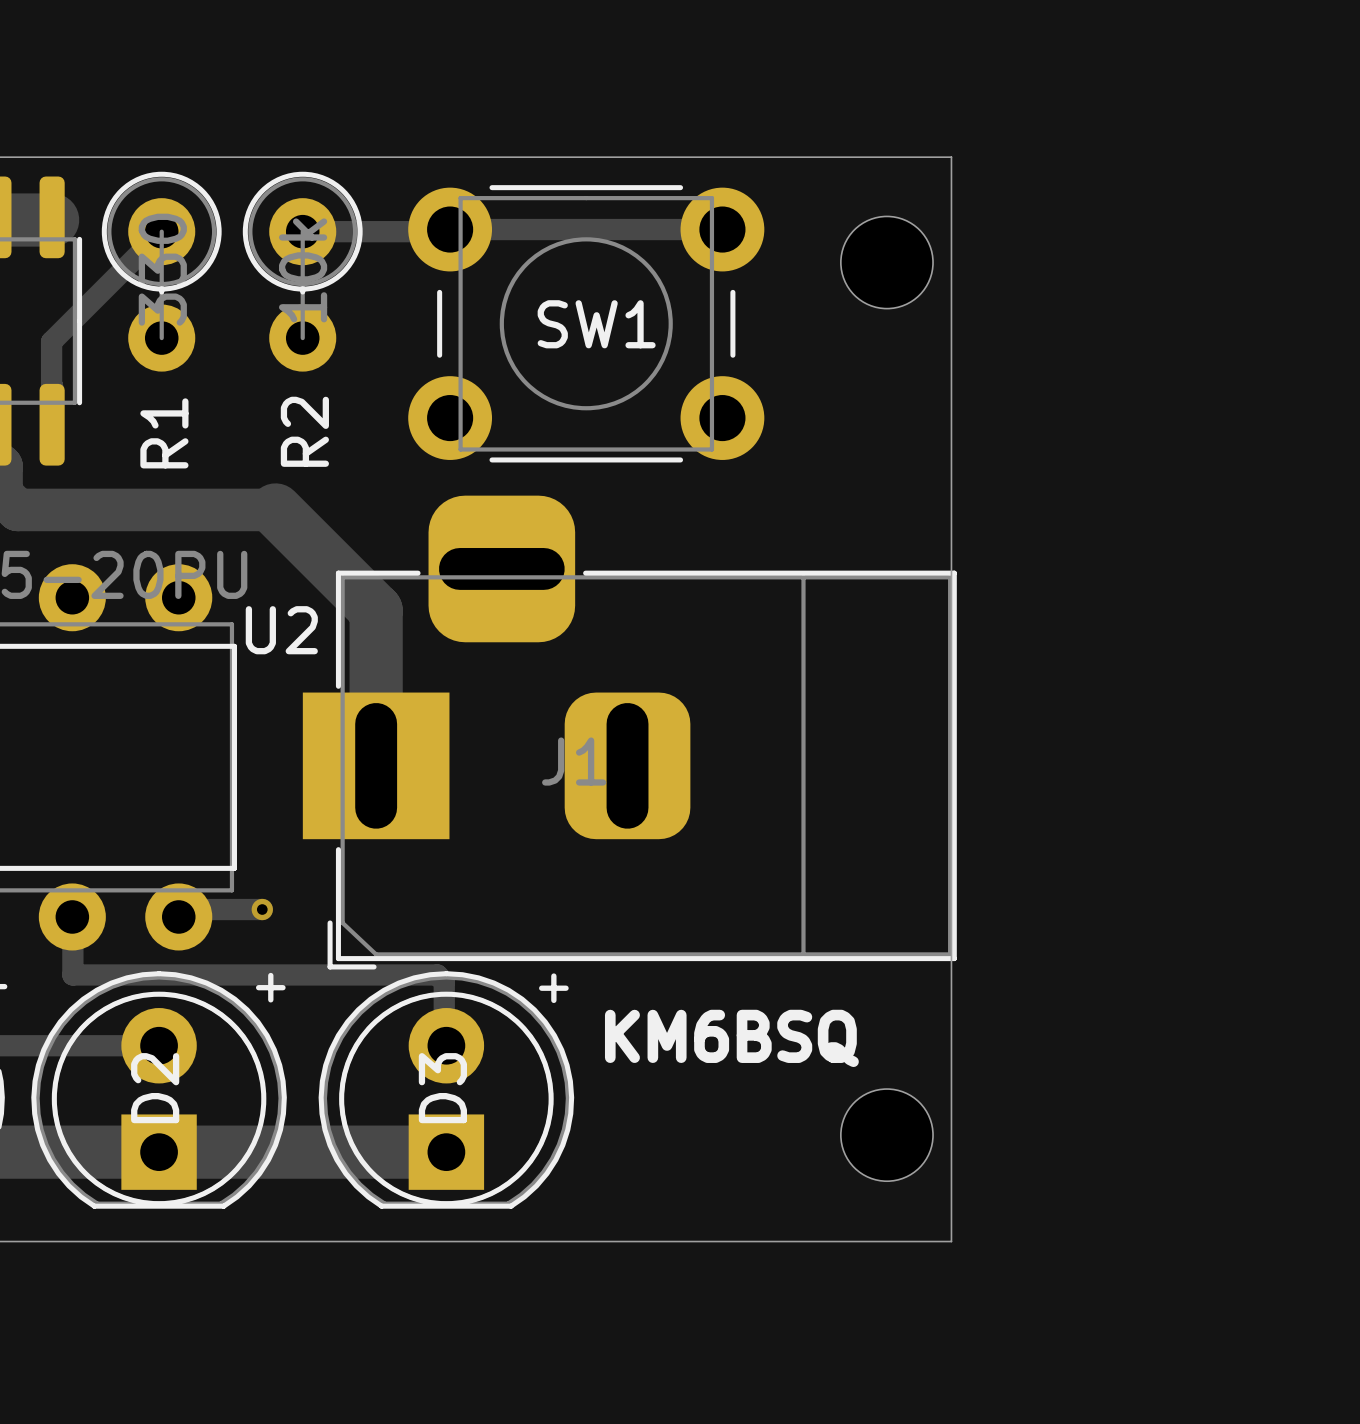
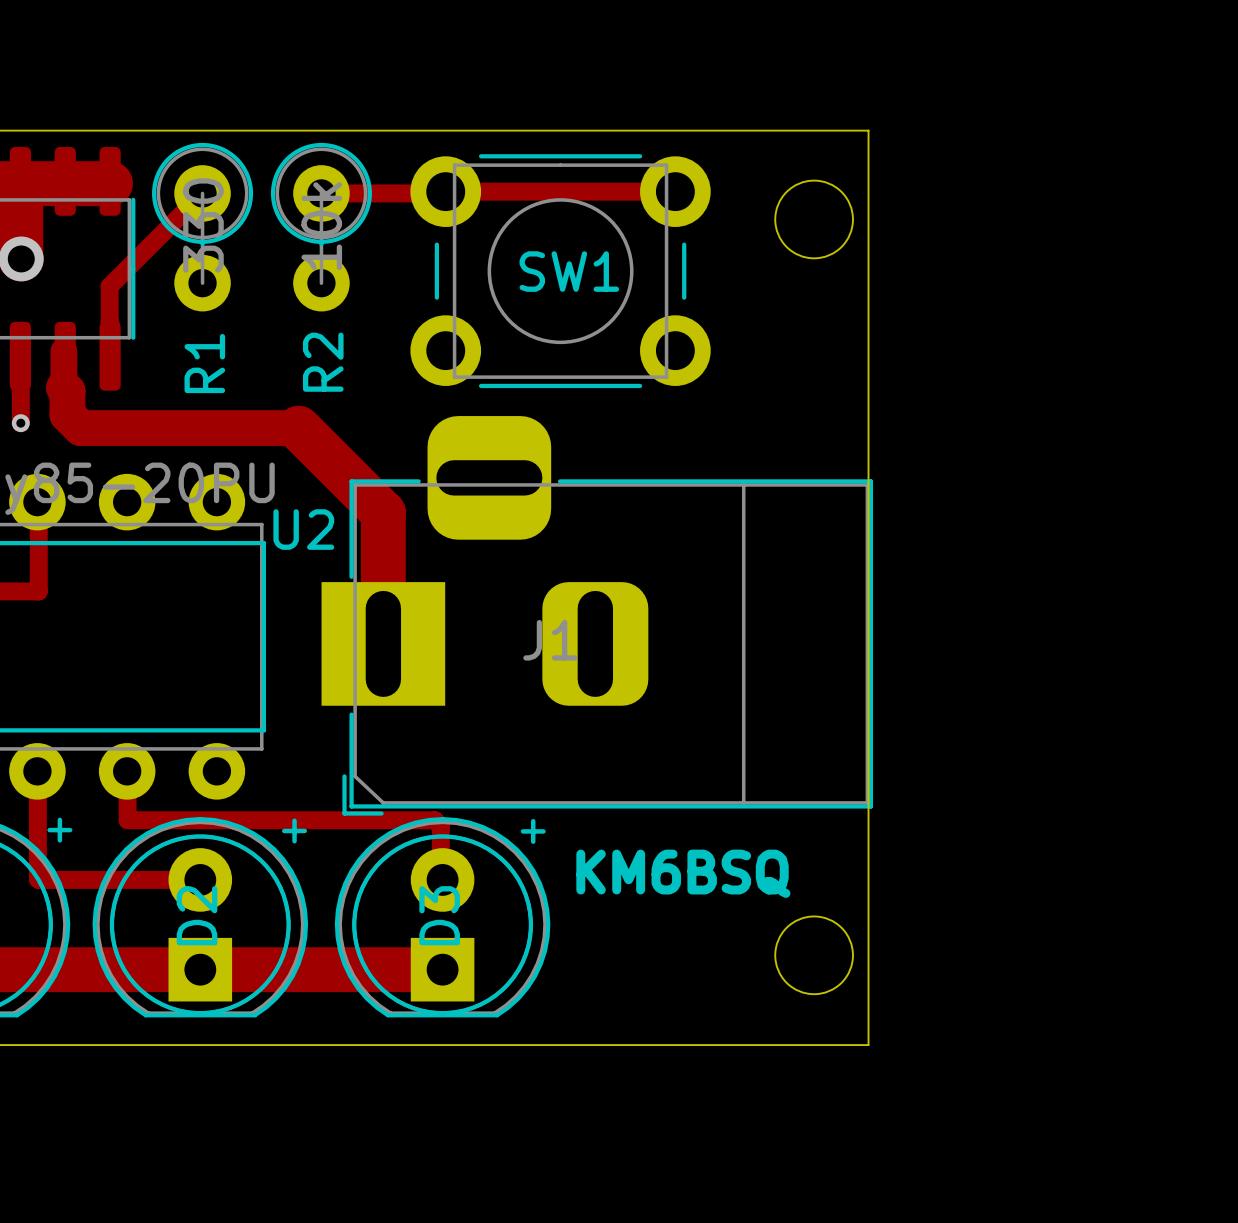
track: (179, 909) (262, 909) -> none
via: (262, 909) -> none

